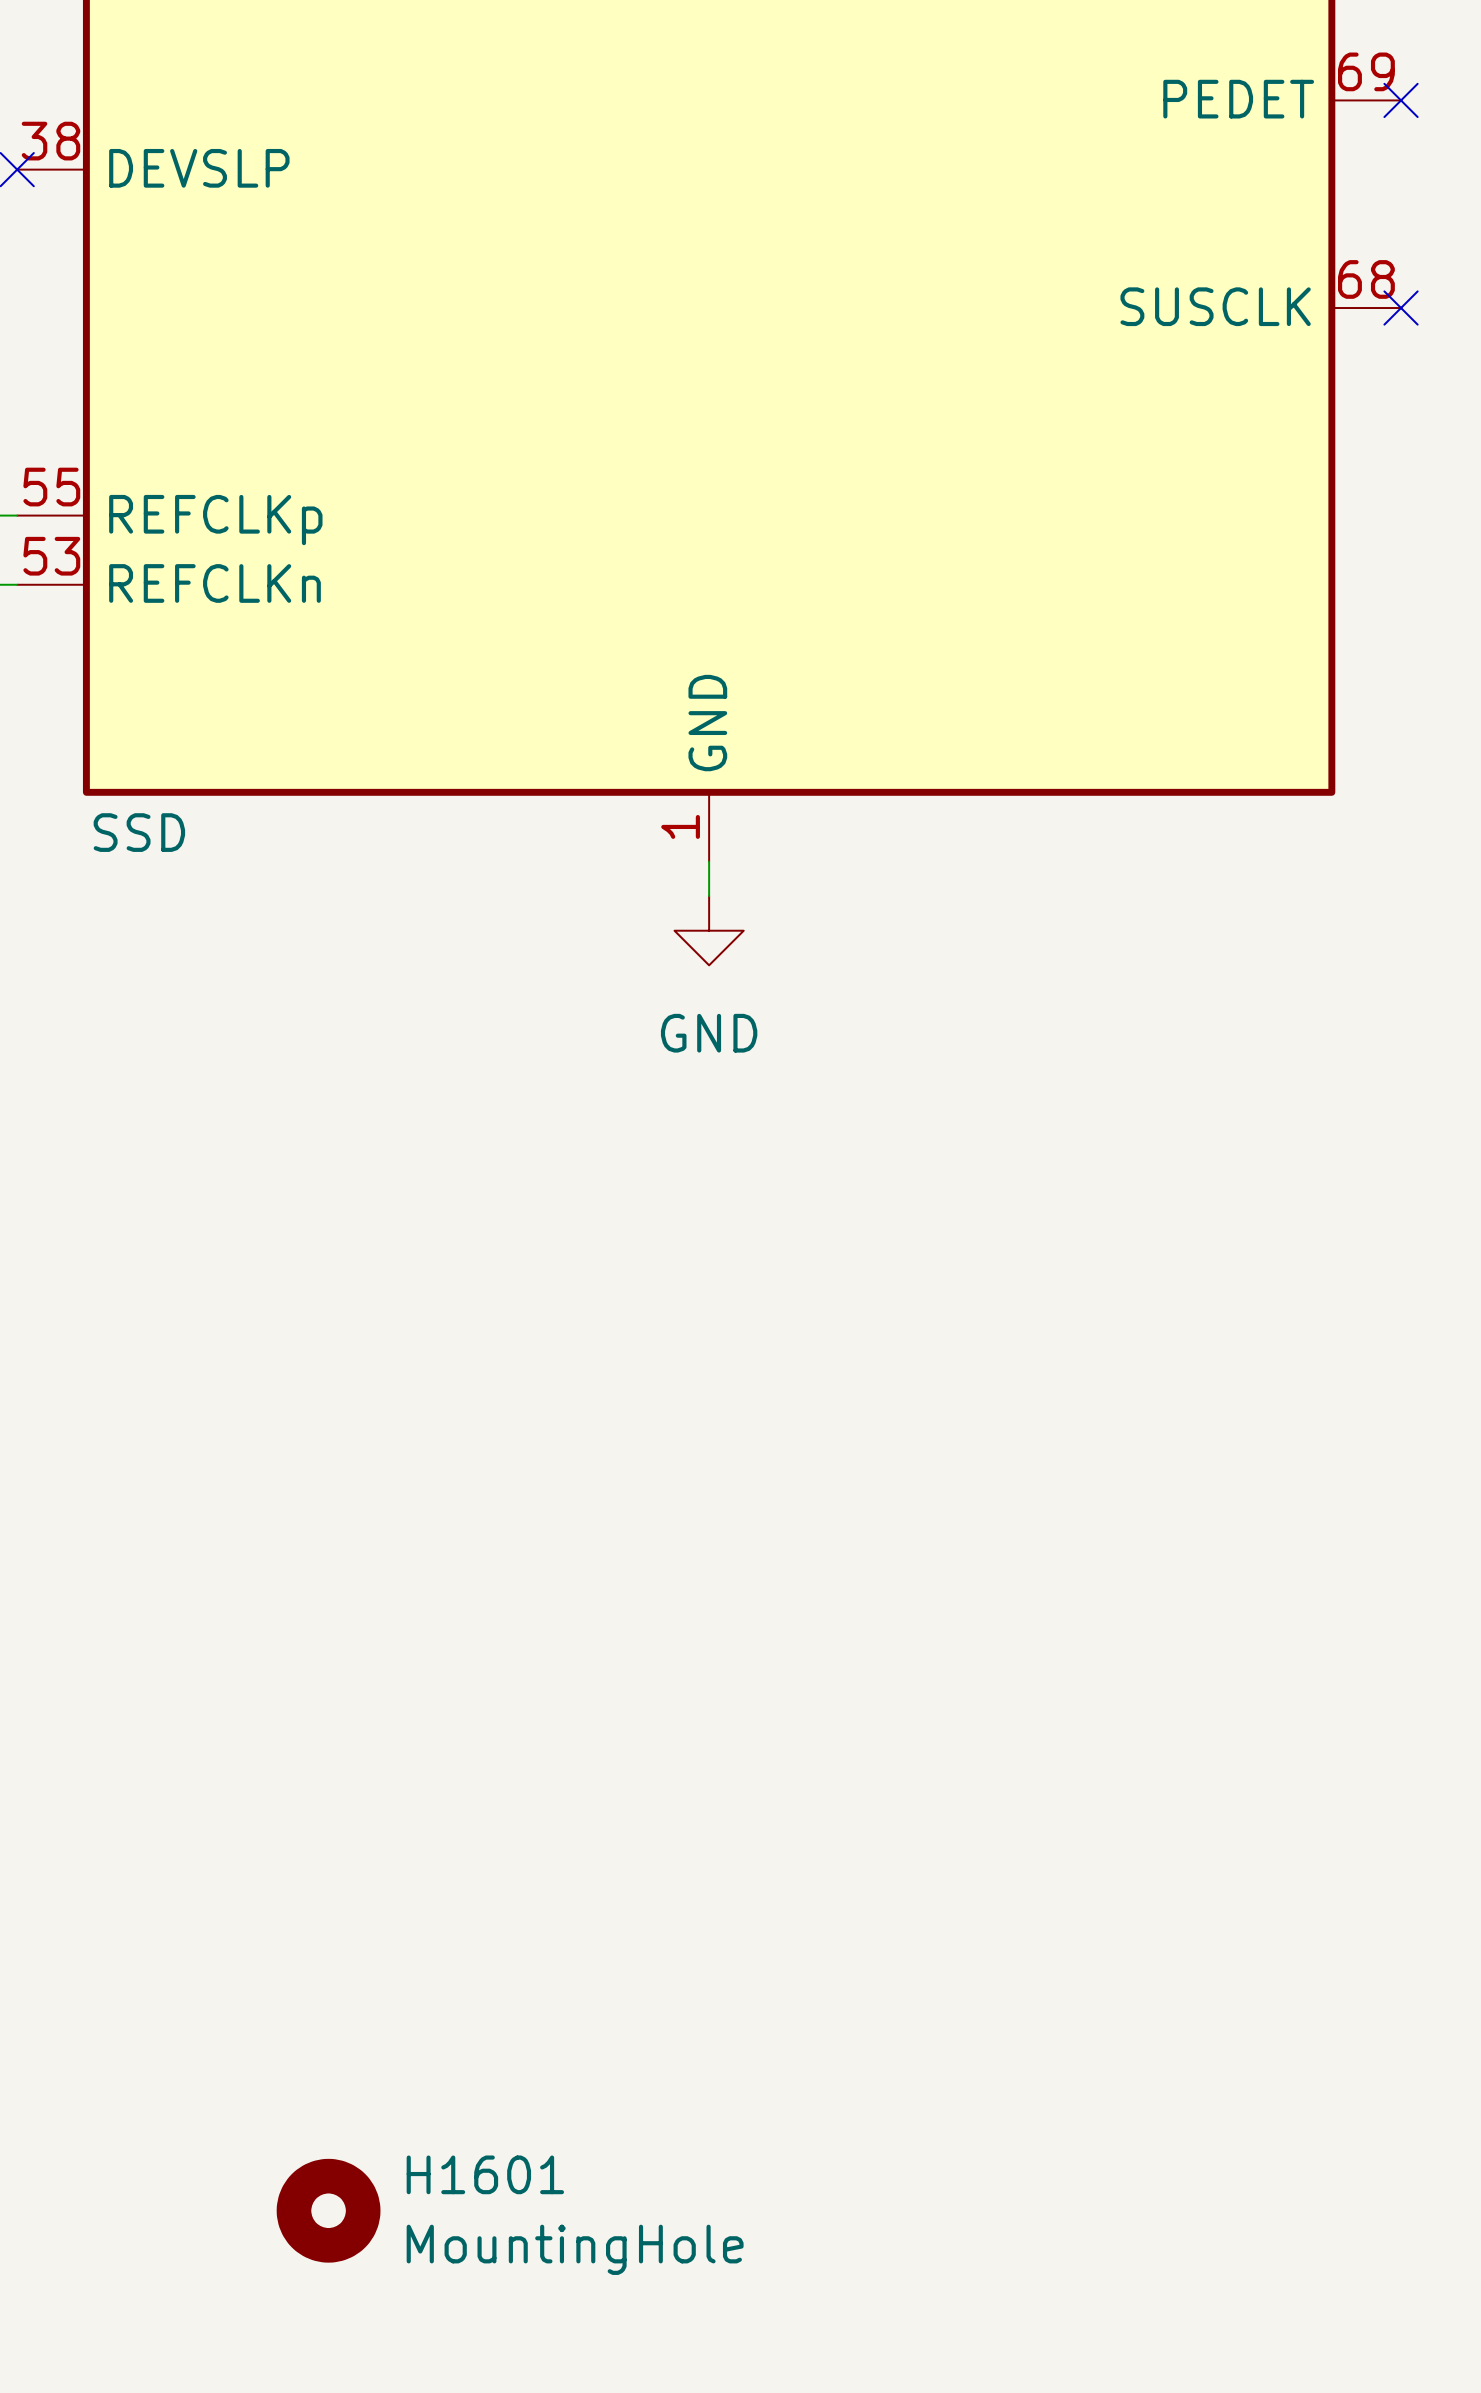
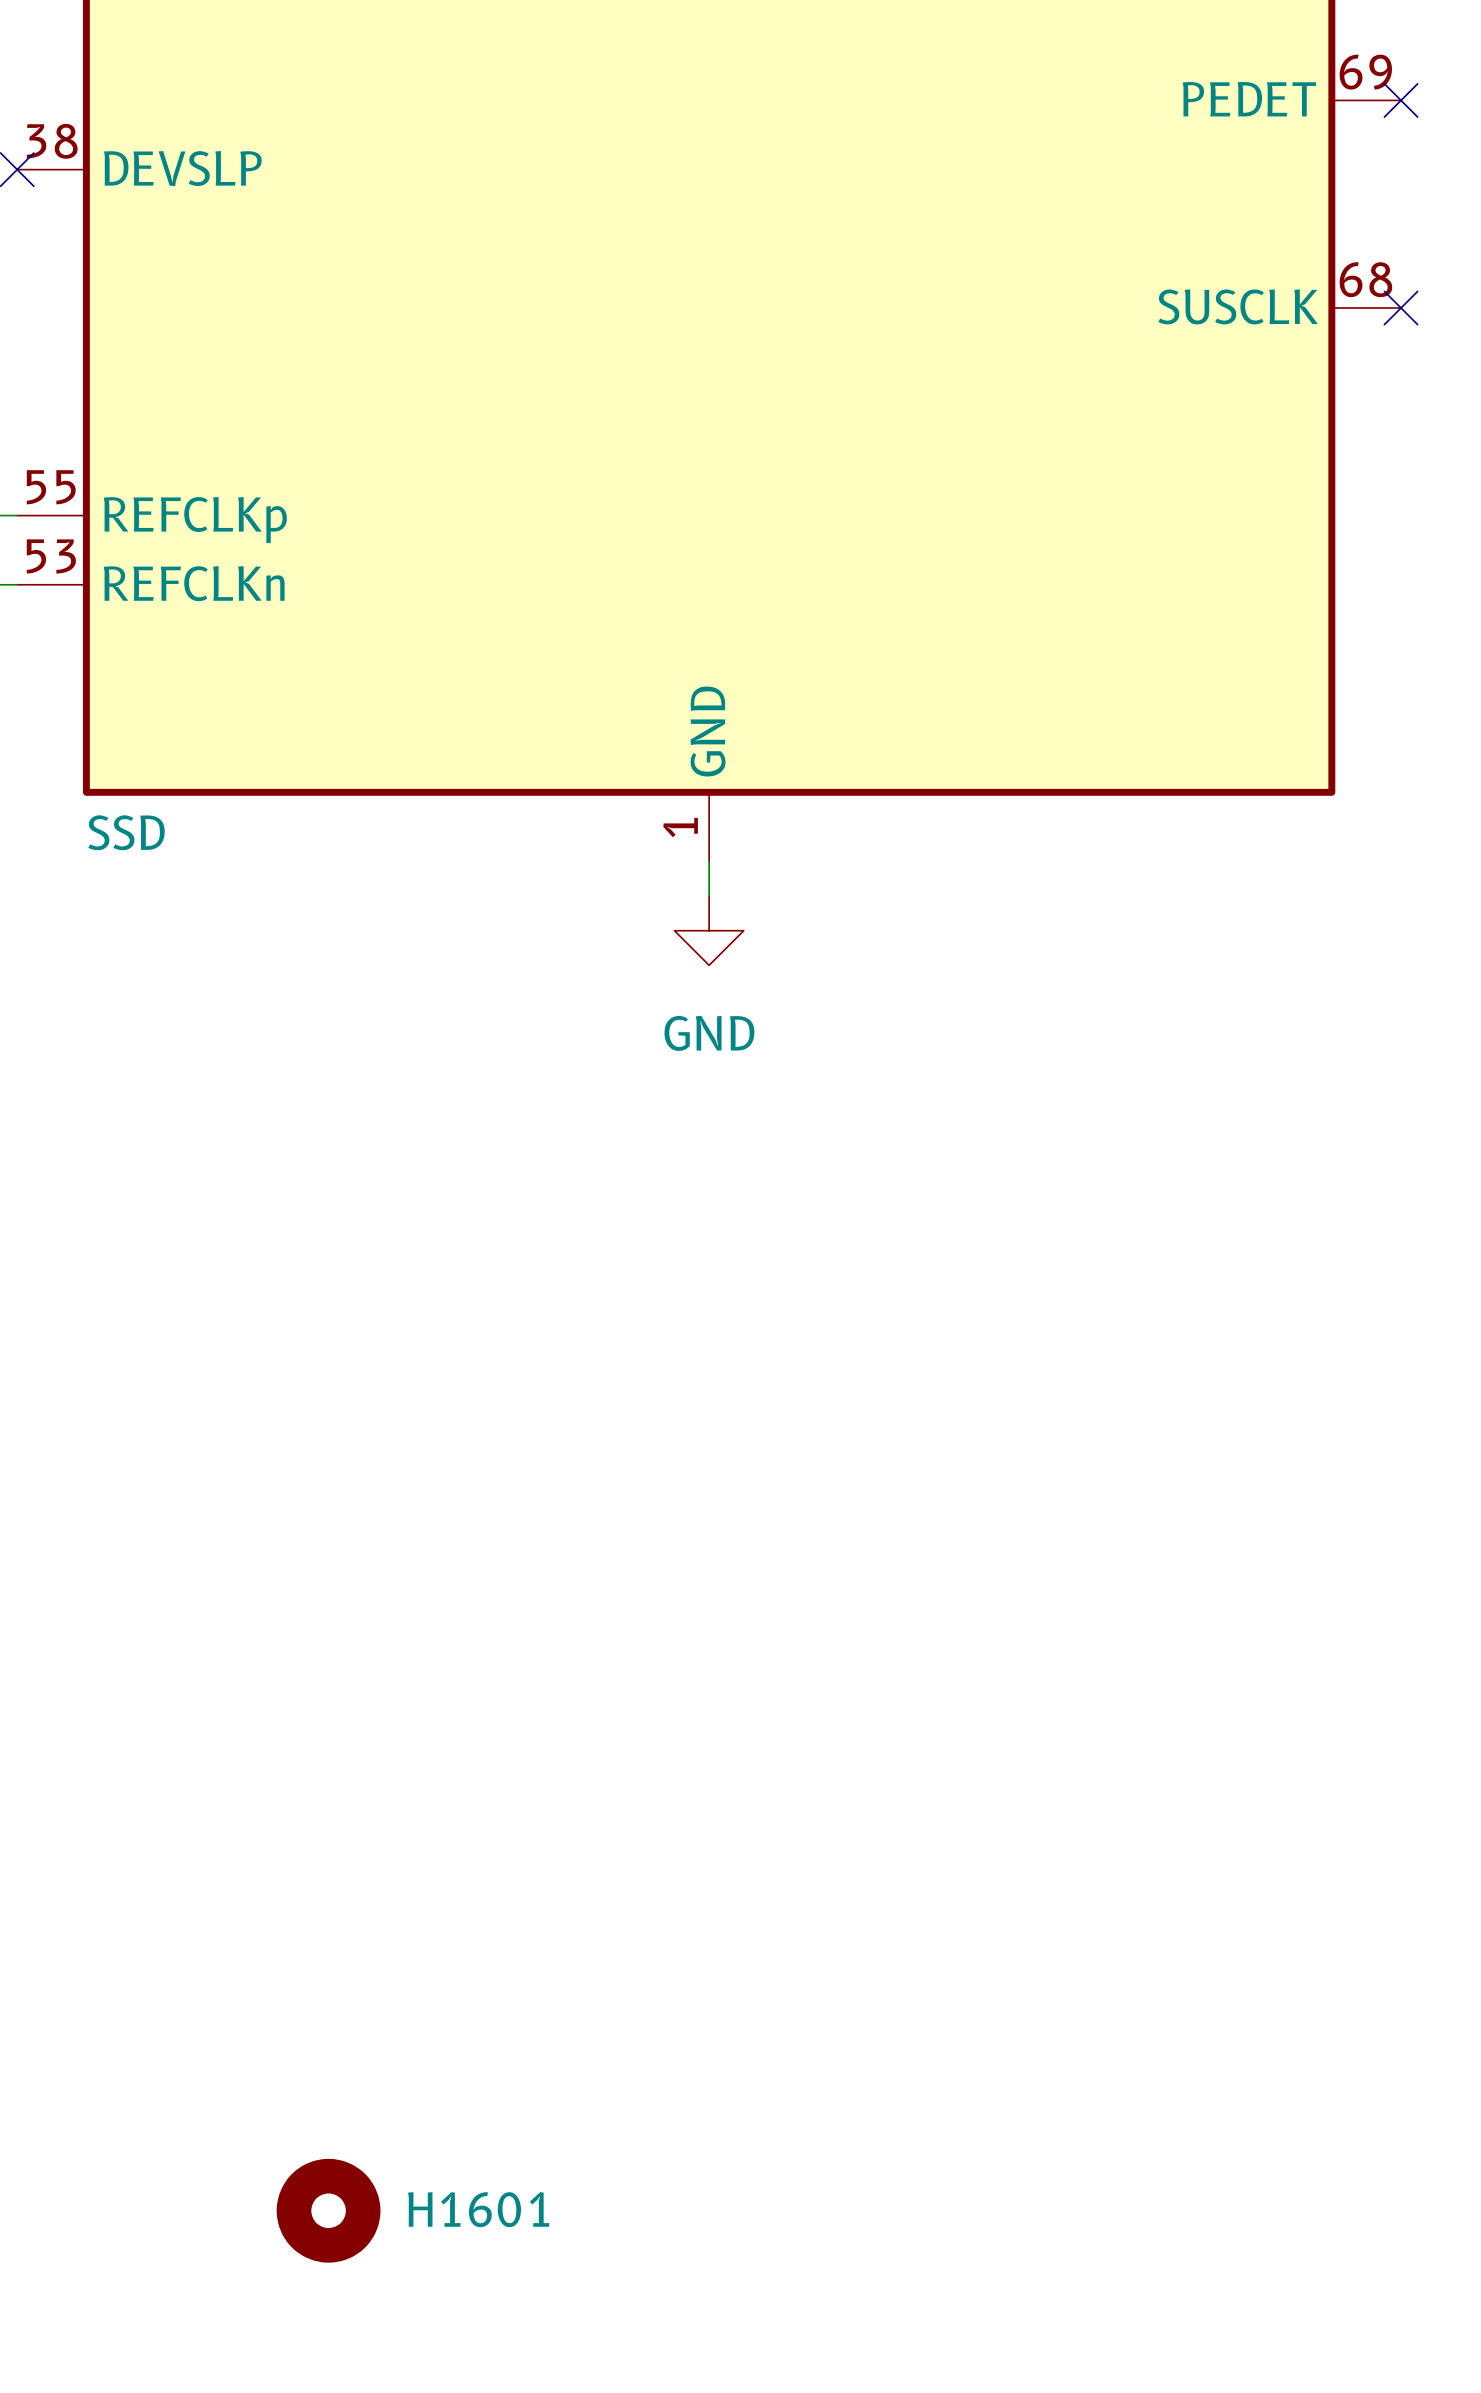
H1601 name position: H1601 (485, 2174) -> H1601 (478, 2209)
H1601 value: MountingHole (575, 2249) -> none

